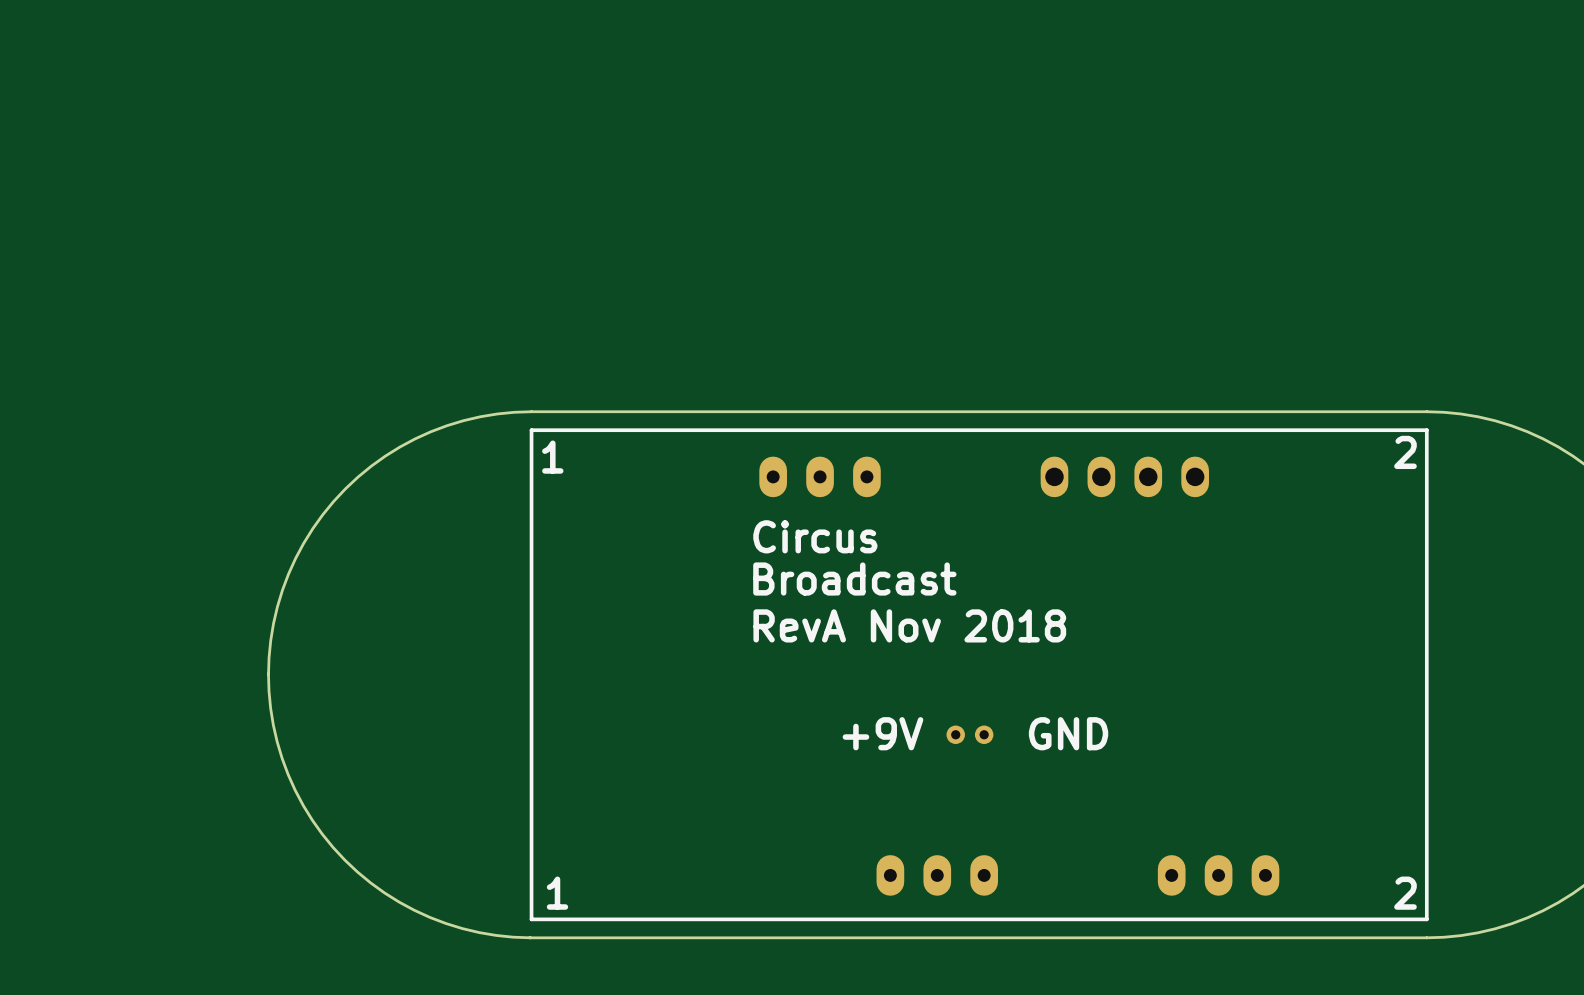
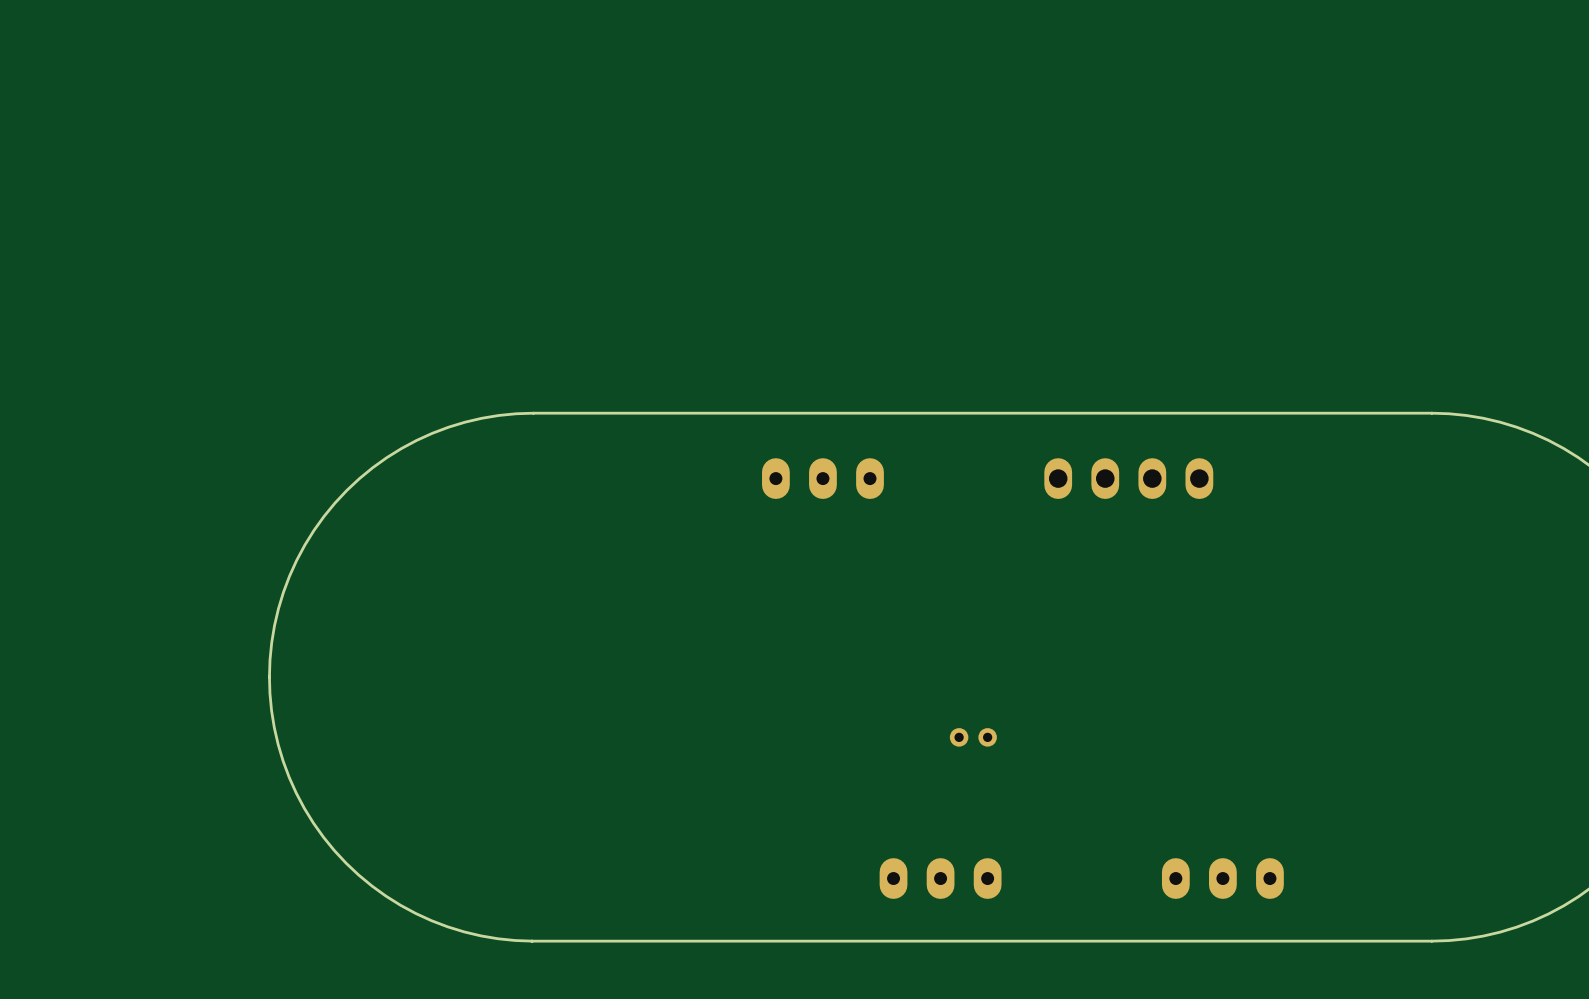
line: (1426, 430) (1426, 919) (531, 919) (531, 430) (1426, 430) -> none
text: 2 (1405, 452) -> none
text: 1 (552, 457) -> none
text: Circus (815, 536) -> none
text: Broadcast (854, 579) -> none
text: RevA Nov 2018 (909, 625) -> none
text: +9V (882, 733) -> none
text: GND (1068, 733) -> none
text: 1 (557, 893) -> none
text: 2 (1405, 893) -> none

